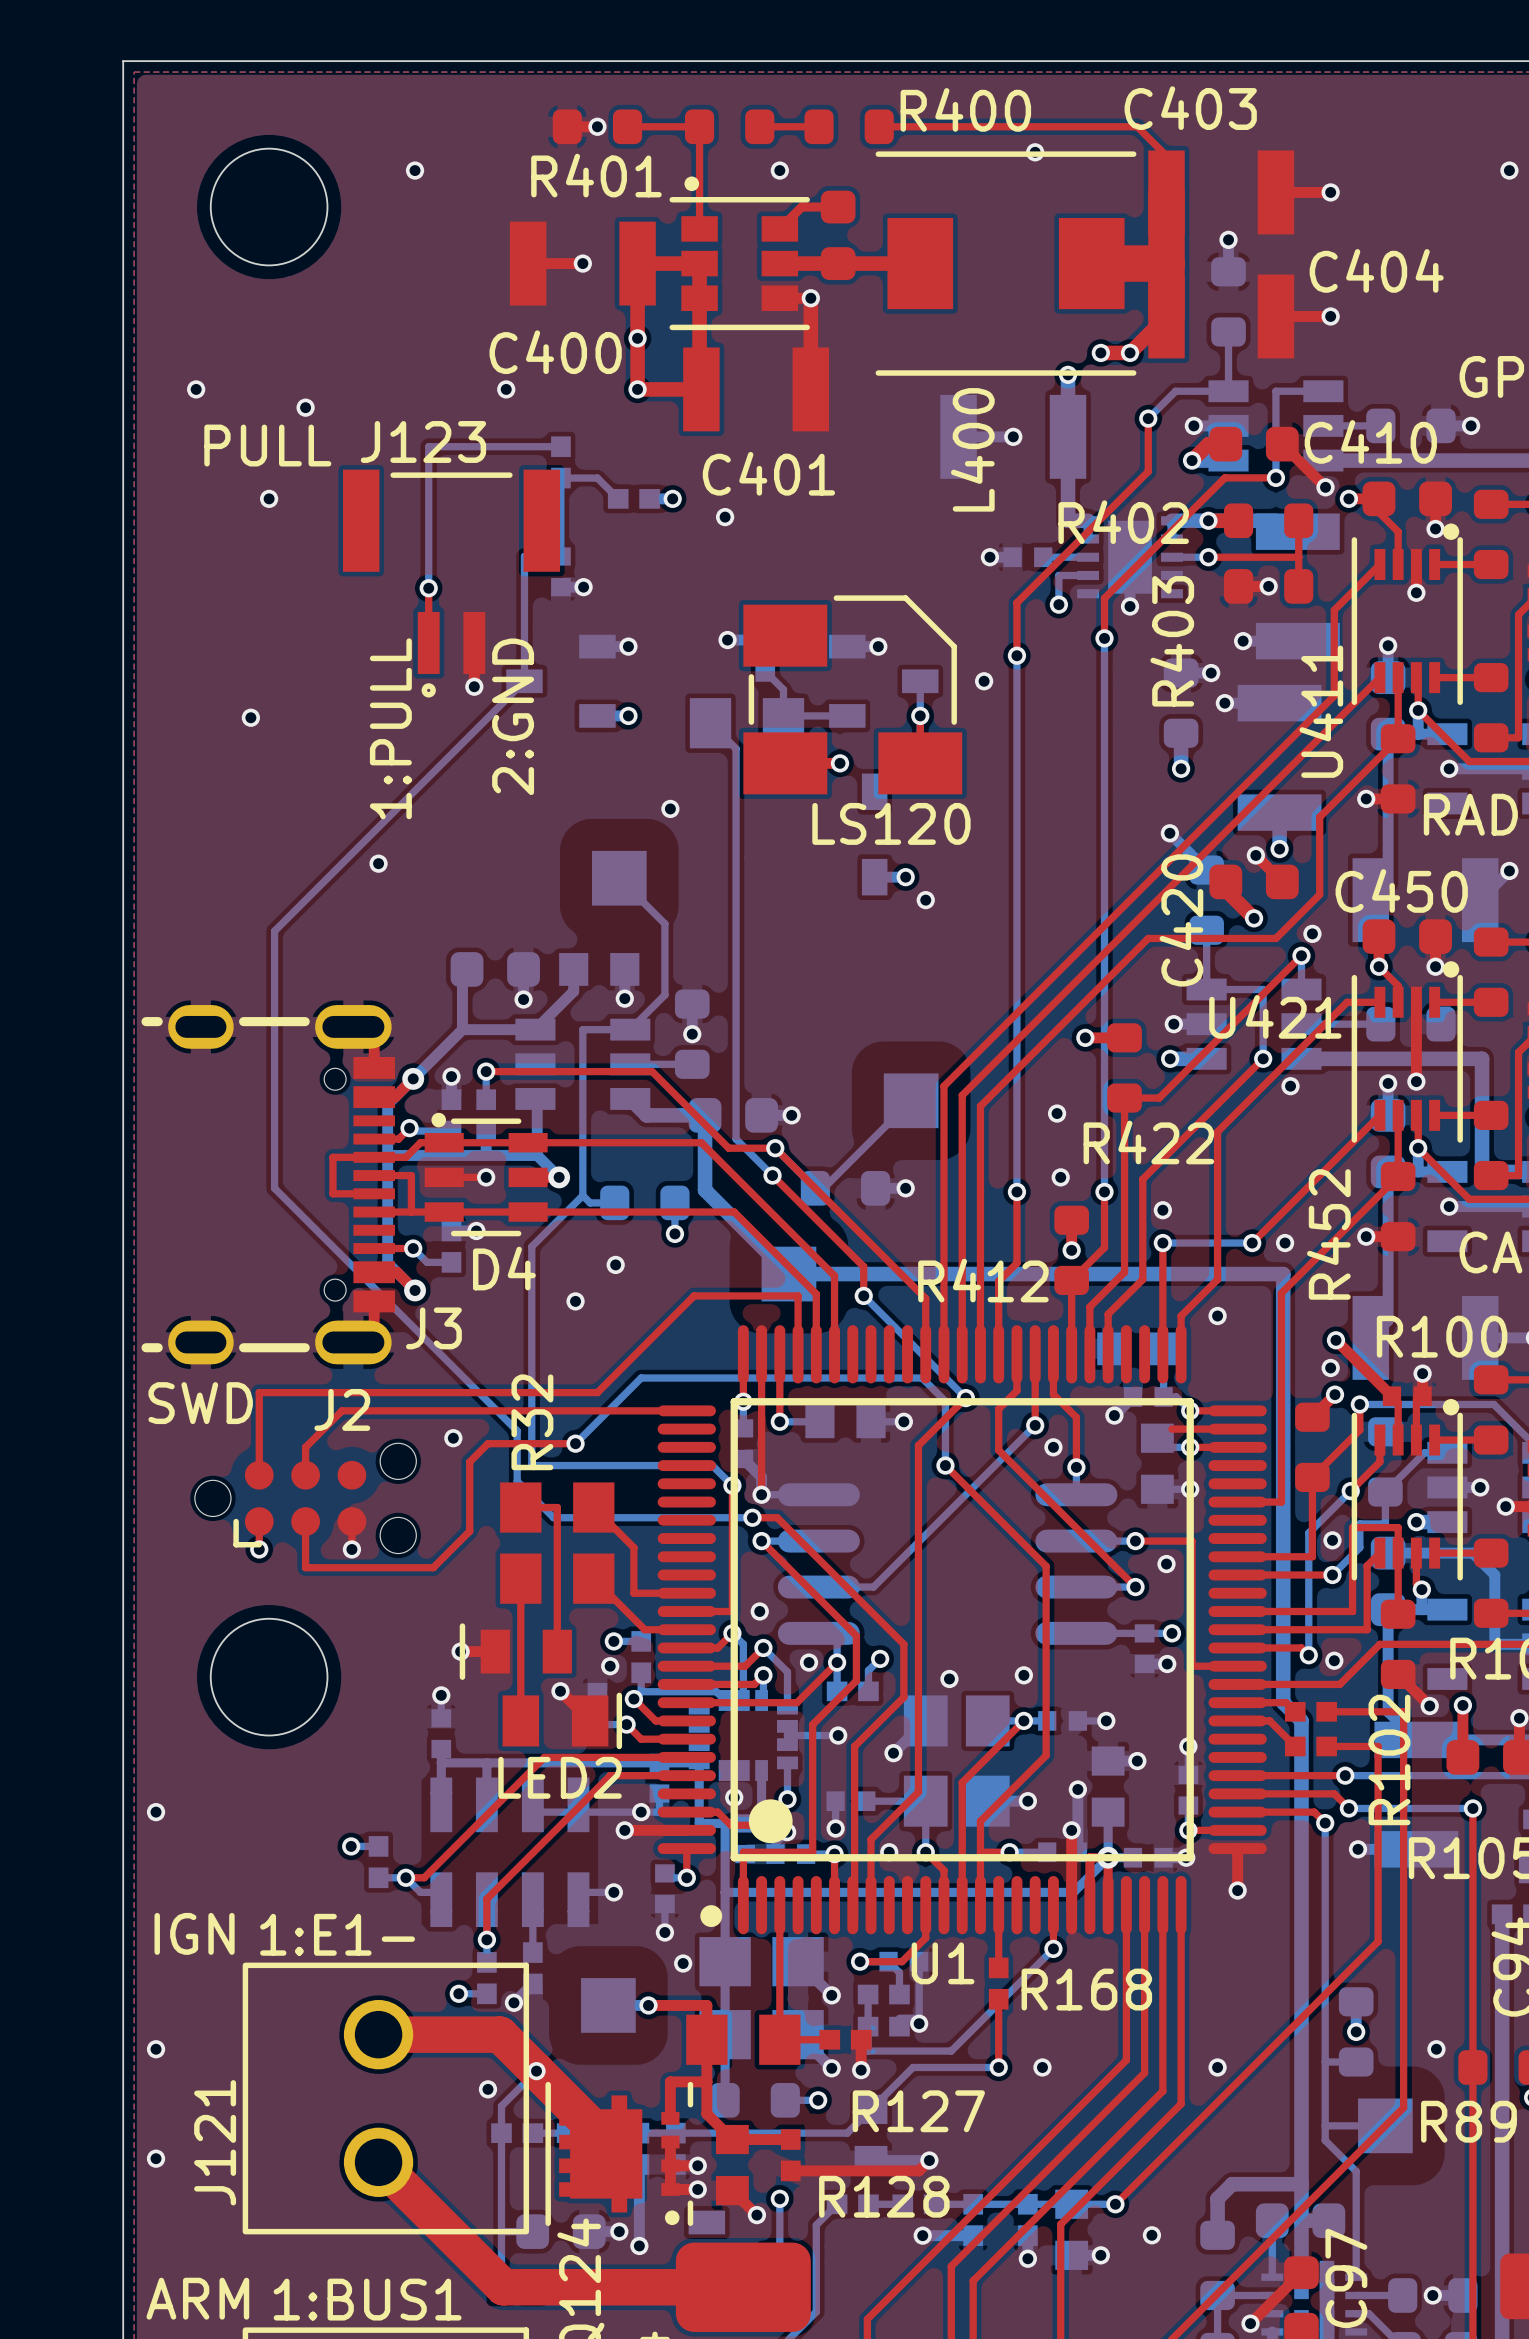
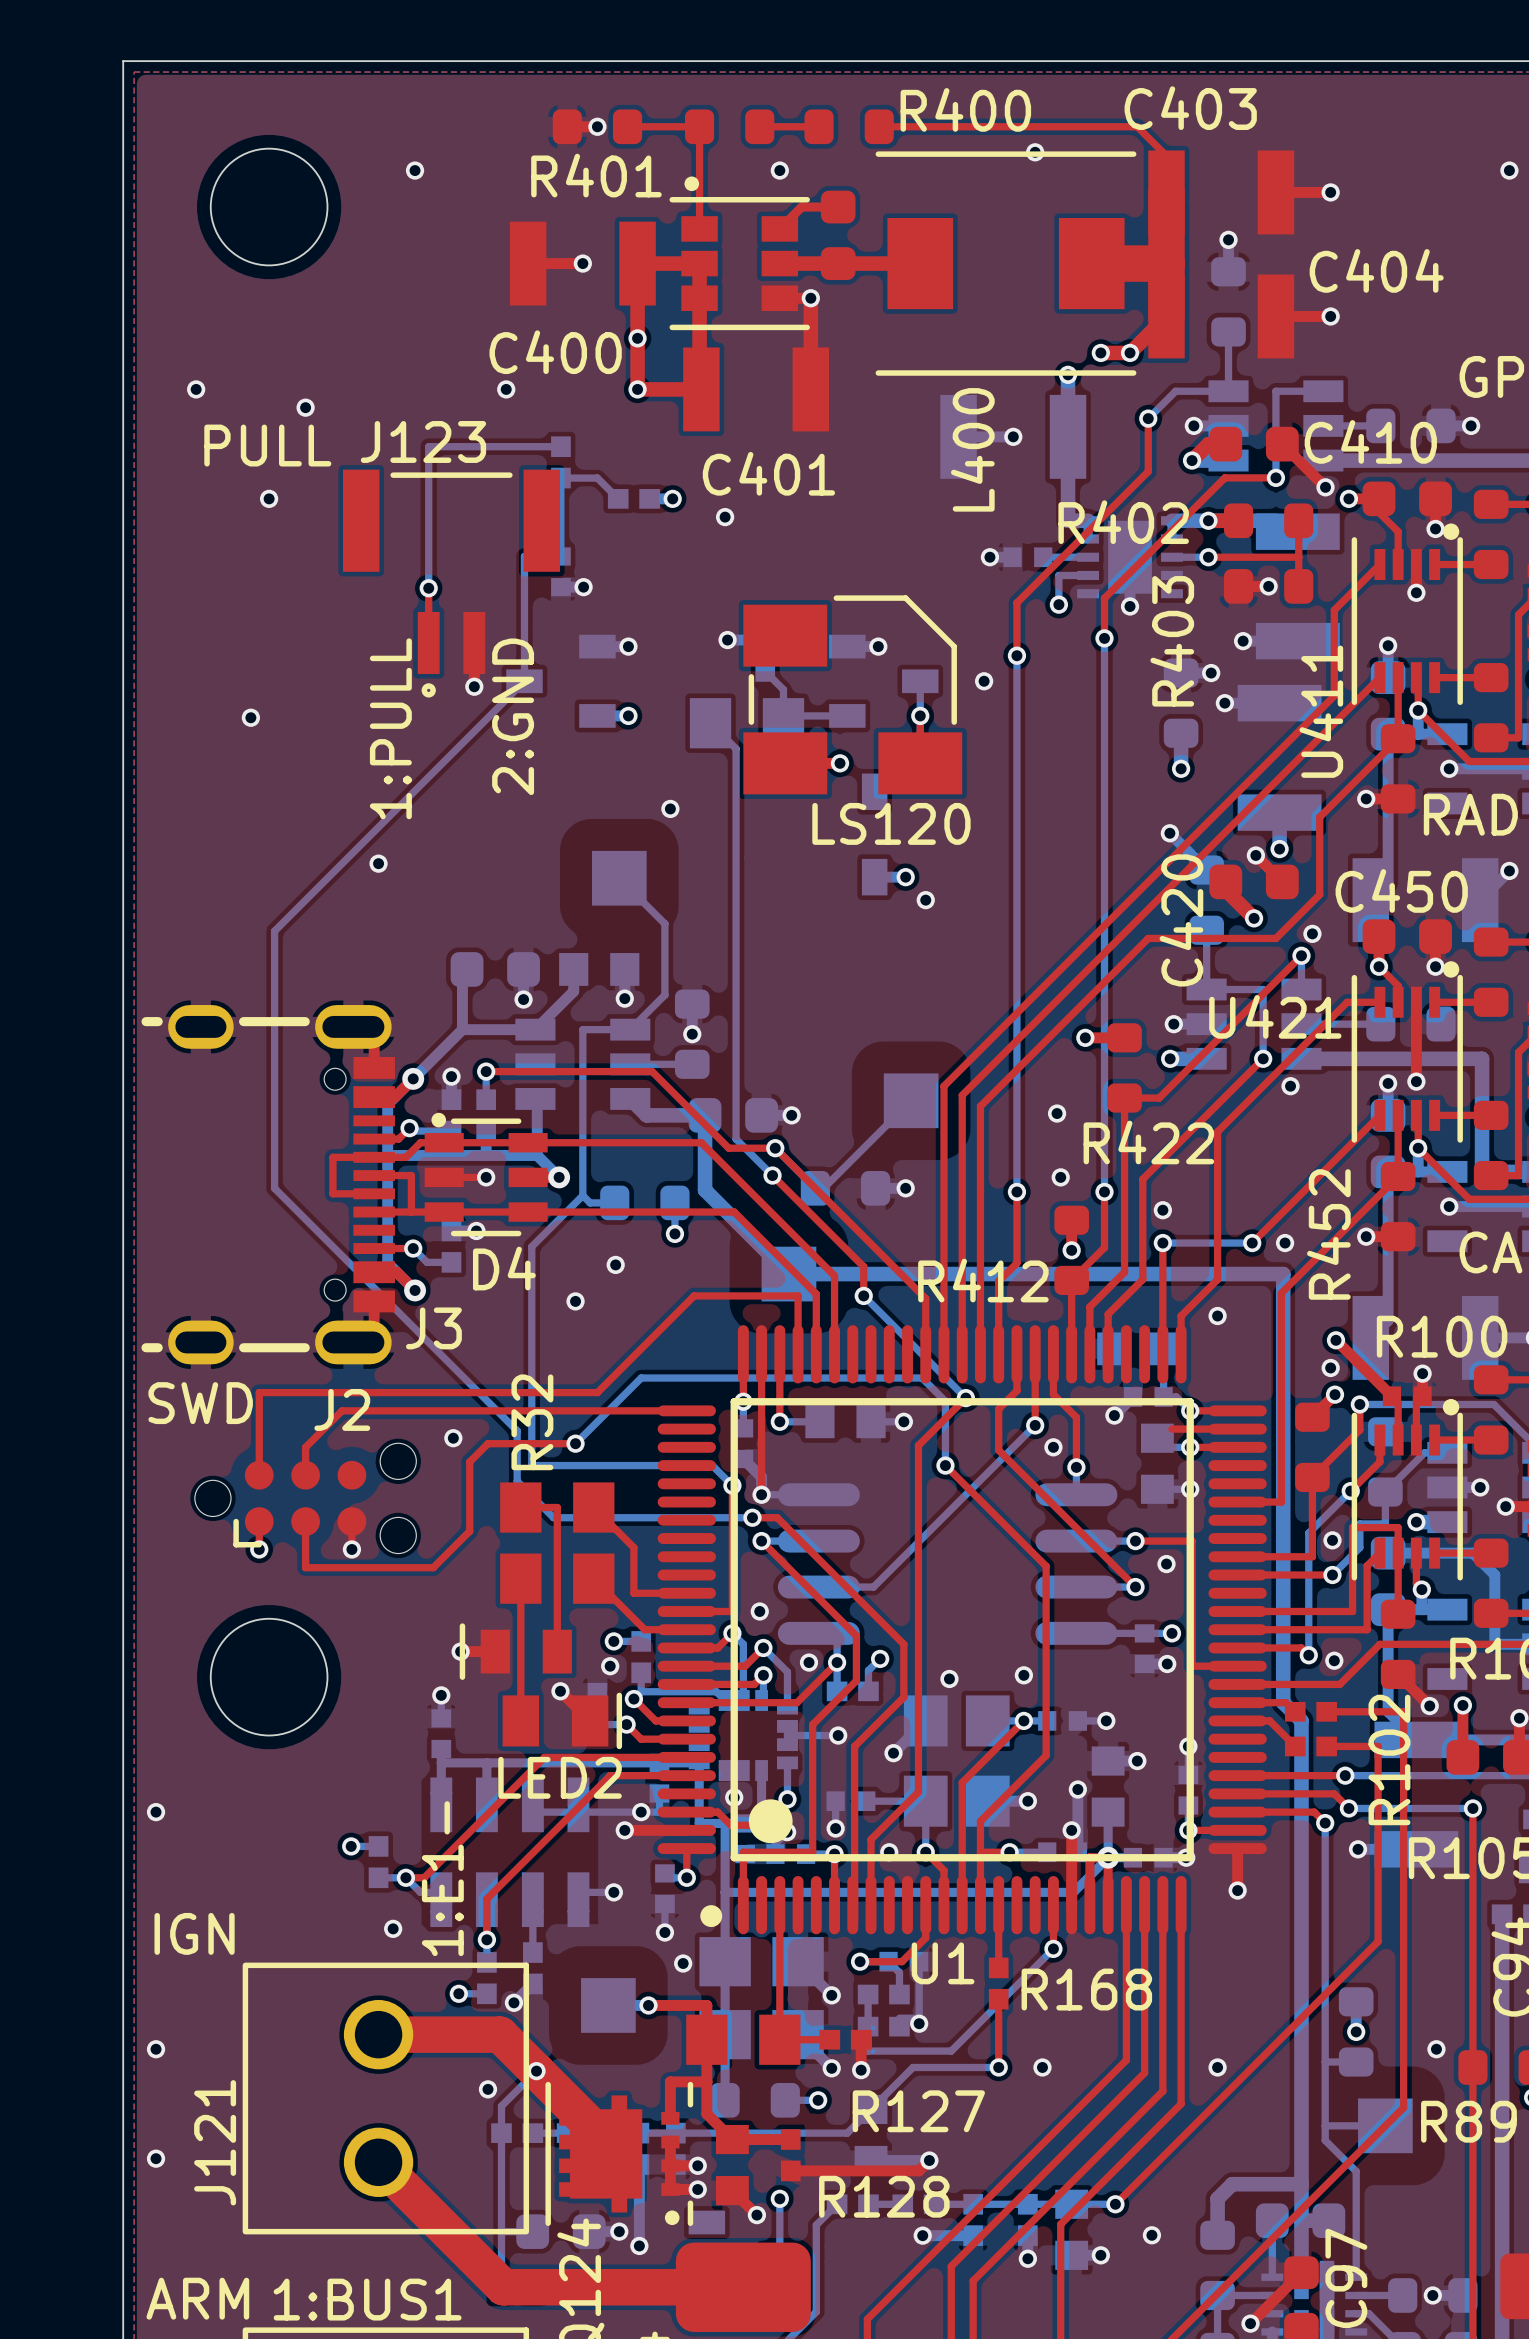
via: none -> (393, 1928)
text rotation: 0° (337, 1934) -> 90° counterclockwise (442, 1878)

